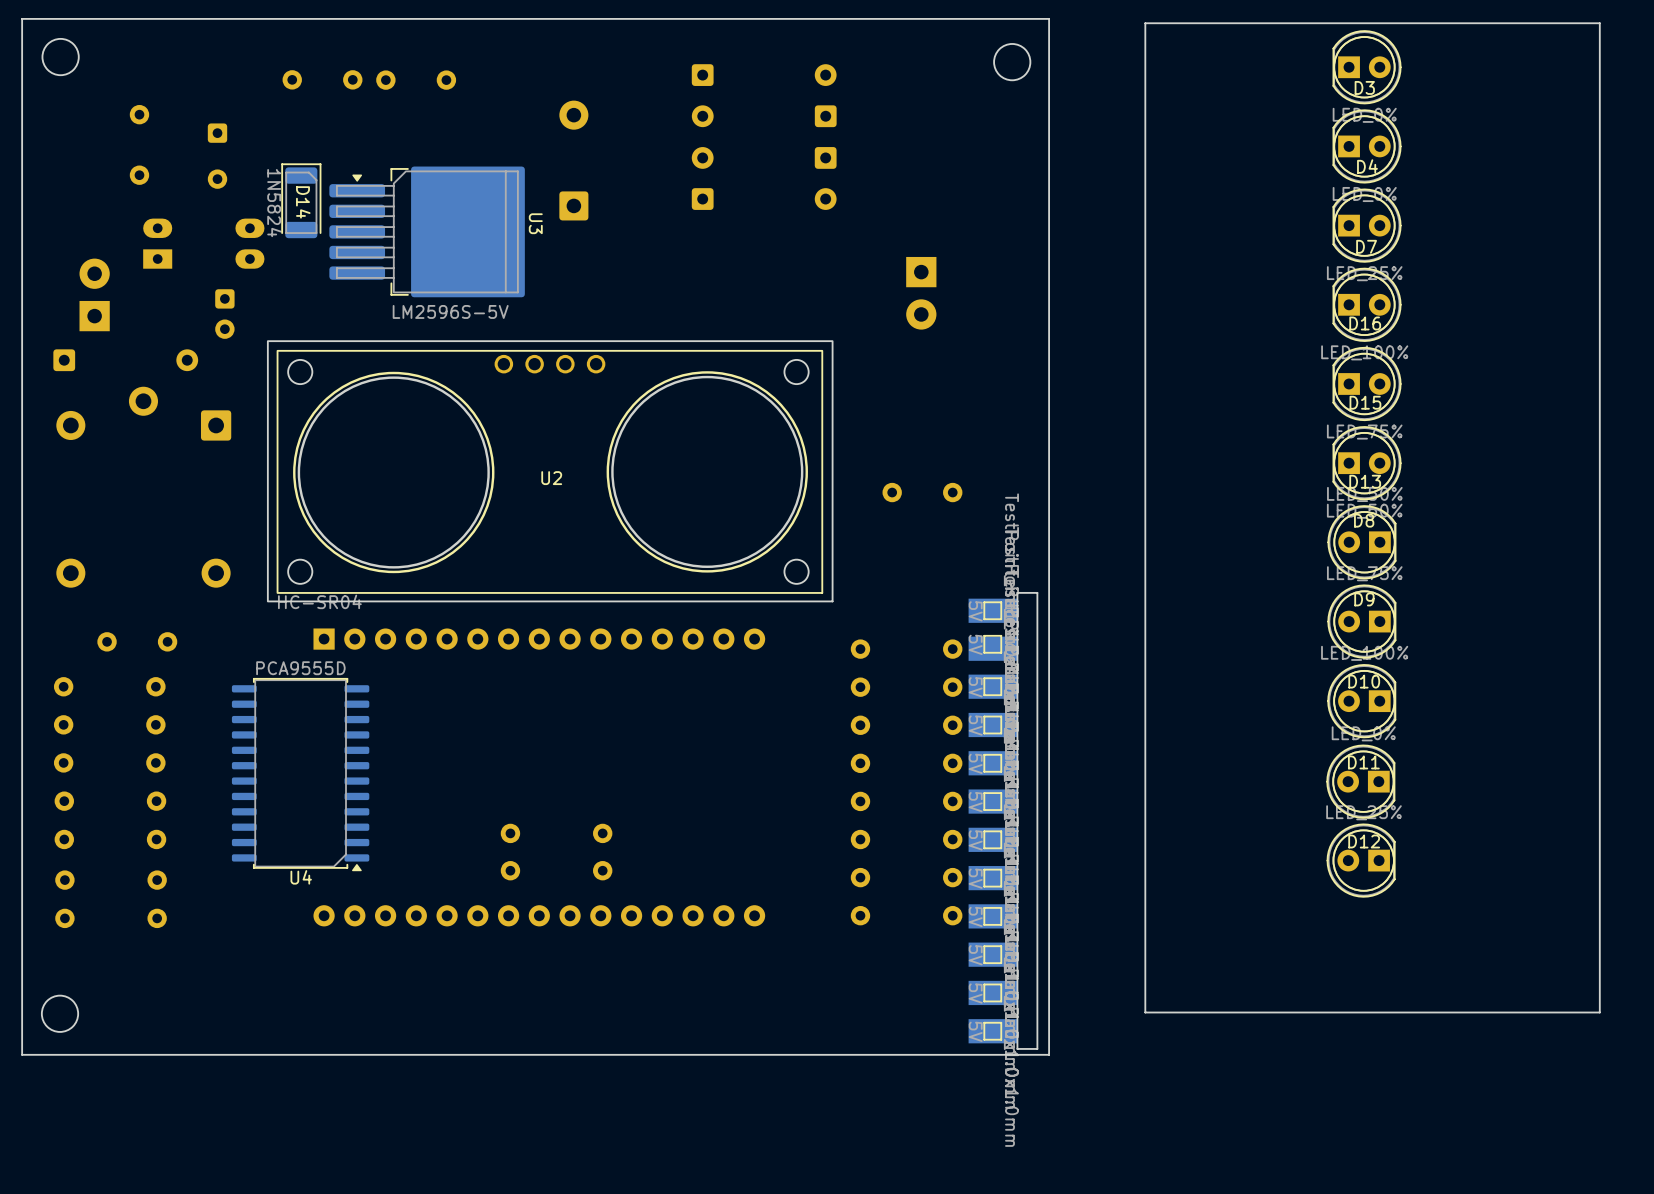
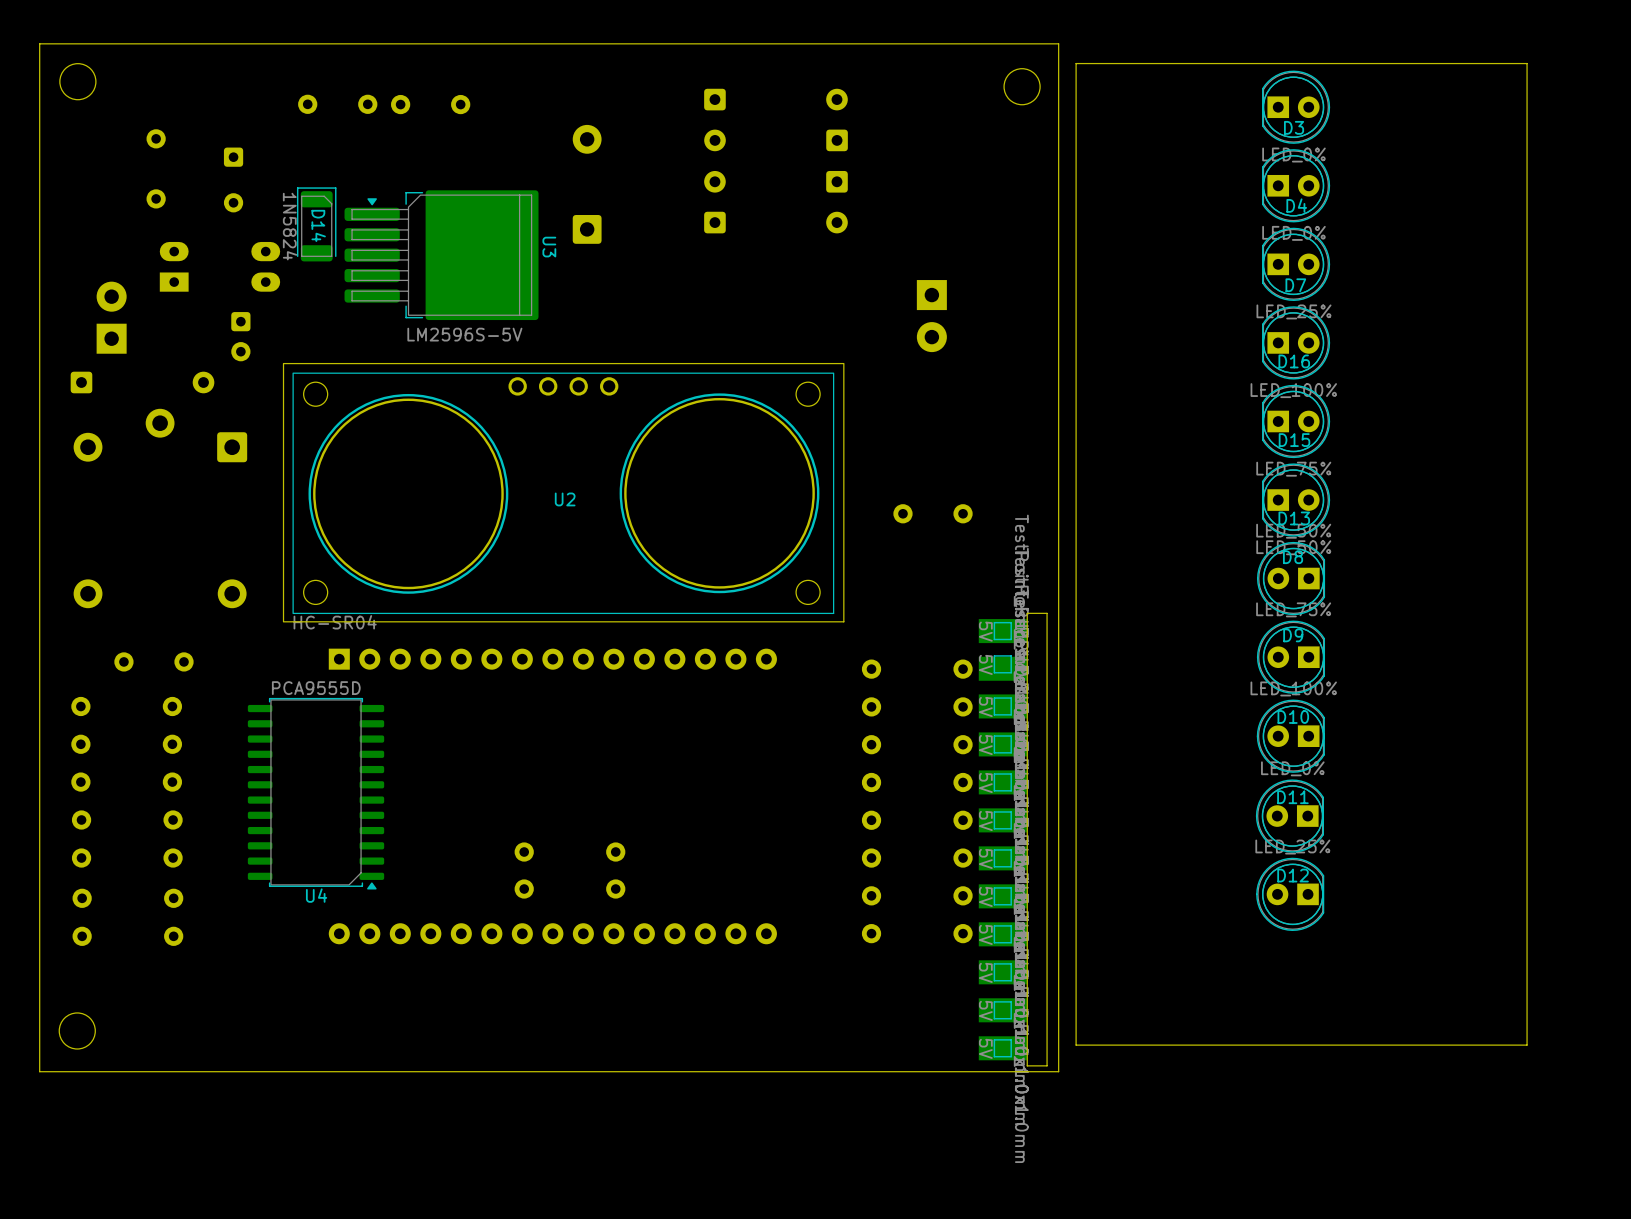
board edge: (1599, 23) (1145, 23) (1145, 1012) (1599, 1012) (1599, 23) -> (1527, 63) (1527, 1045) (1076, 1045) (1076, 63) (1527, 63)
D3 position: (1367, 67) -> (1296, 107)
D4 position: (1367, 146) -> (1296, 185)
D7 position: (1367, 225) -> (1296, 264)
D16 position: (1367, 304) -> (1296, 342)
D15 position: (1367, 383) -> (1296, 421)
D13 position: (1367, 463) -> (1296, 500)
D8 position: (1361, 542) -> (1291, 578)
D9 position: (1361, 621) -> (1290, 657)
D10 position: (1361, 701) -> (1290, 736)
D11 position: (1360, 781) -> (1289, 816)
D12 position: (1361, 860) -> (1290, 894)

